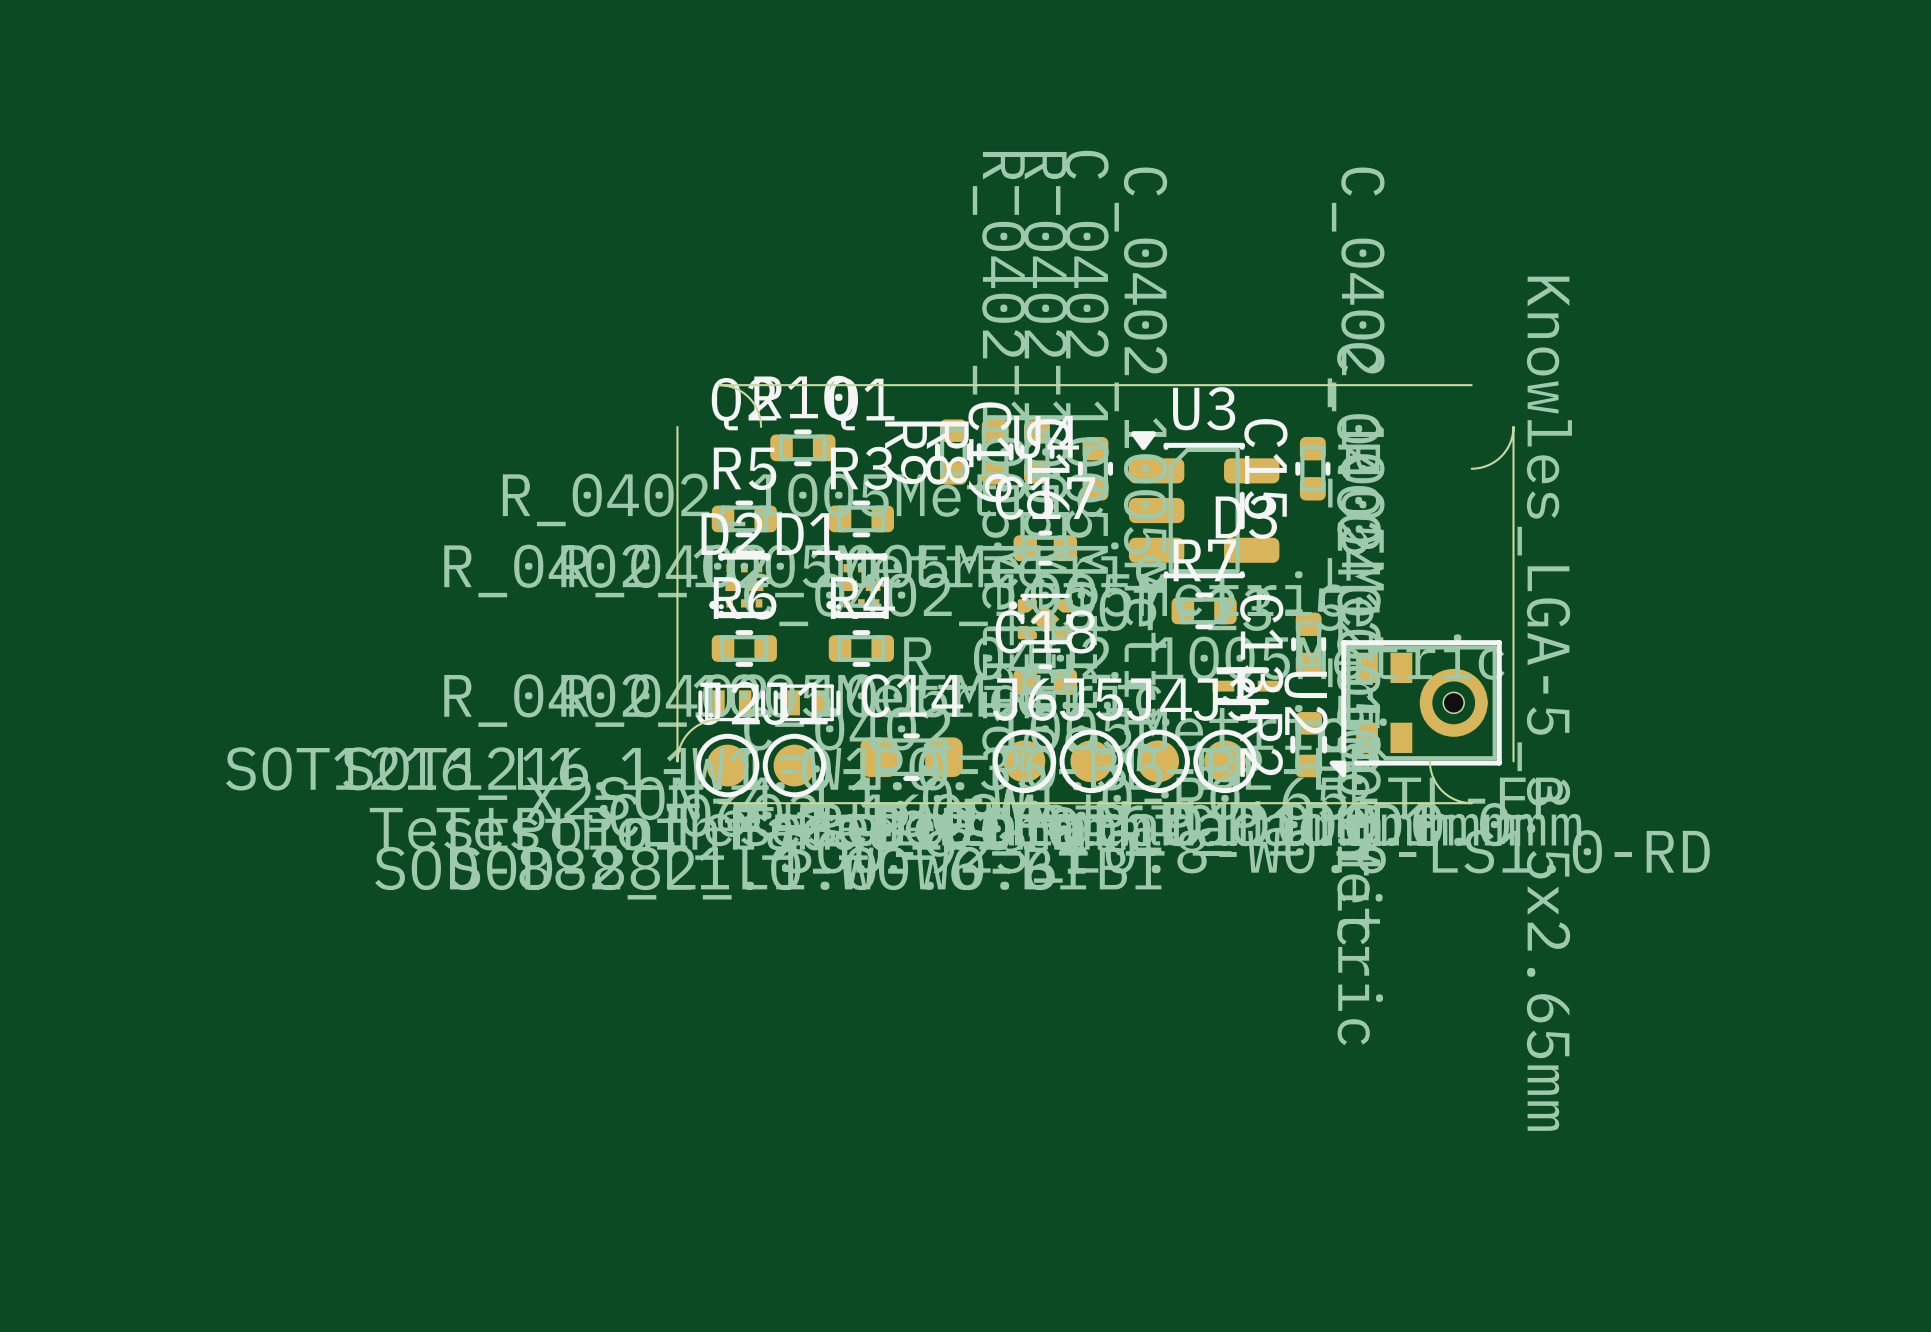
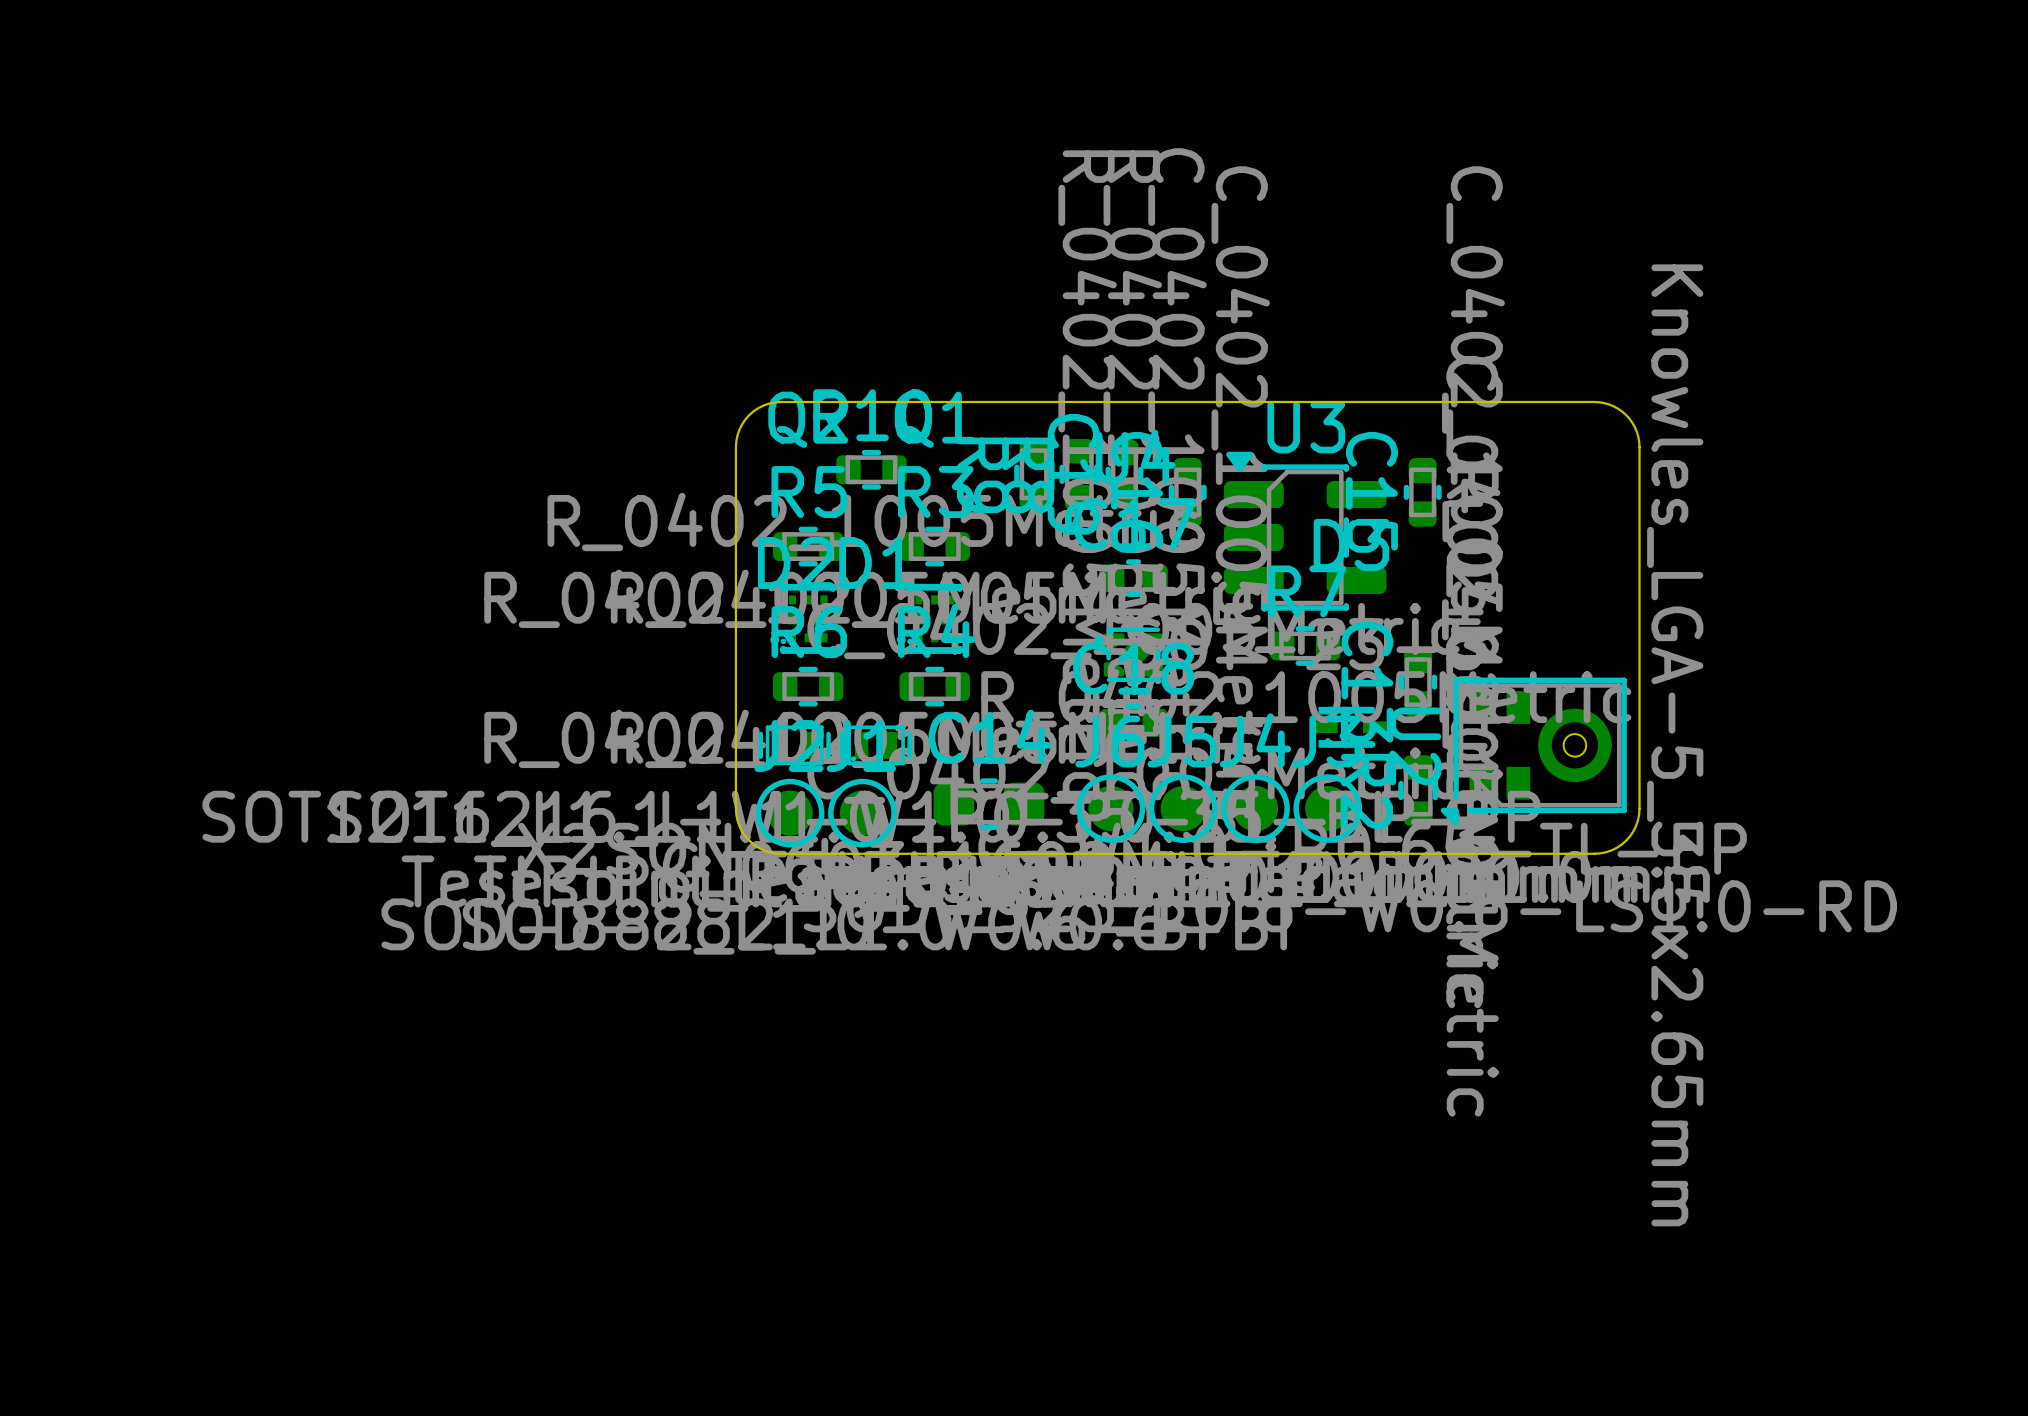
board edge: (719, 385) (733, 387) (748, 397) (758, 413) (761, 426) -> (781, 401) (763, 405) (749, 415) (739, 429) (735, 447)
board edge: (1513, 426) (1509, 445) (1501, 456) (1489, 464) (1471, 468) -> (1639, 447) (1636, 432) (1626, 415) (1613, 406) (1594, 401)
board edge: (719, 719) (701, 723) (689, 731) (681, 743) (677, 761) -> (781, 853) (763, 850) (749, 840) (739, 825) (735, 808)
board edge: (1429, 761) (1434, 779) (1442, 790) (1457, 800) (1471, 803) -> (1639, 808) (1636, 825) (1626, 840) (1611, 850) (1594, 853)

